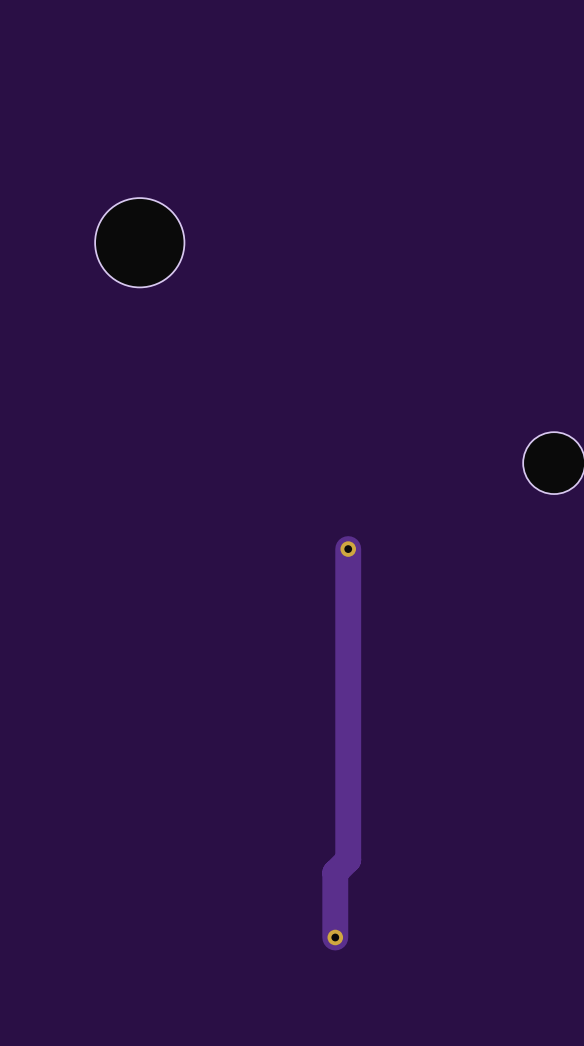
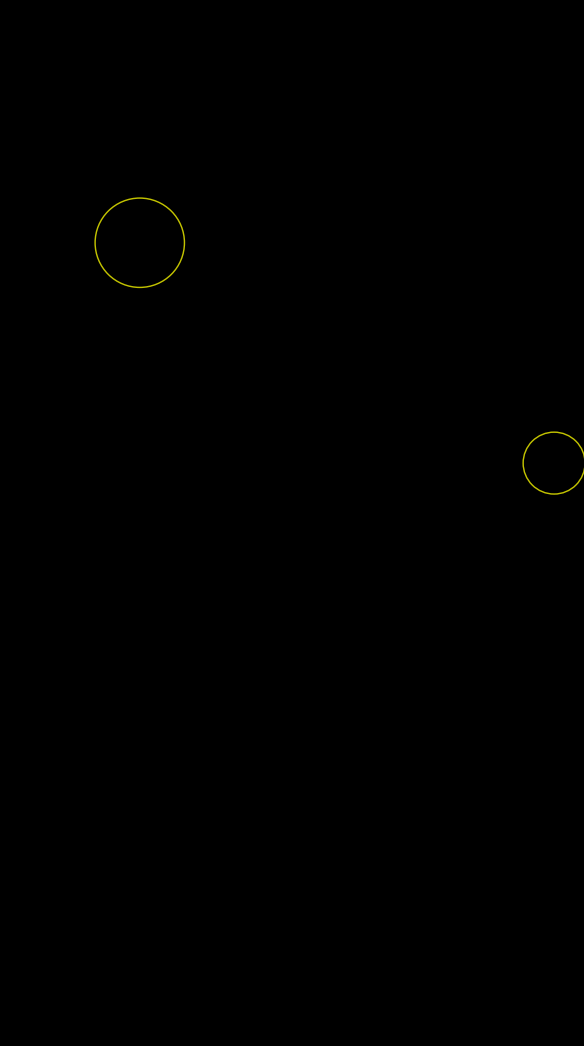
track: (348, 549) (348, 859) (335, 872) (335, 937) -> none
via: (348, 549) -> none
via: (335, 937) -> none

